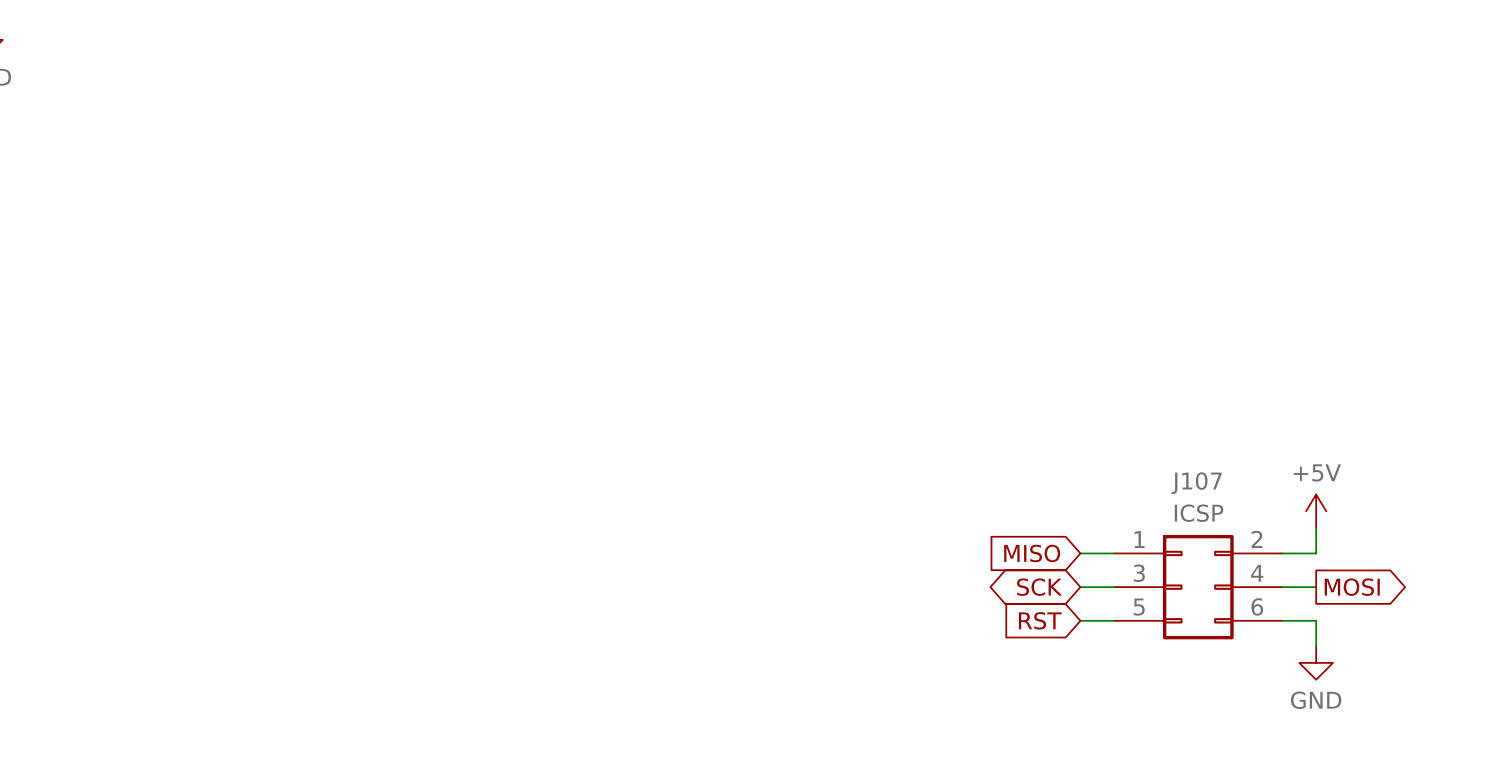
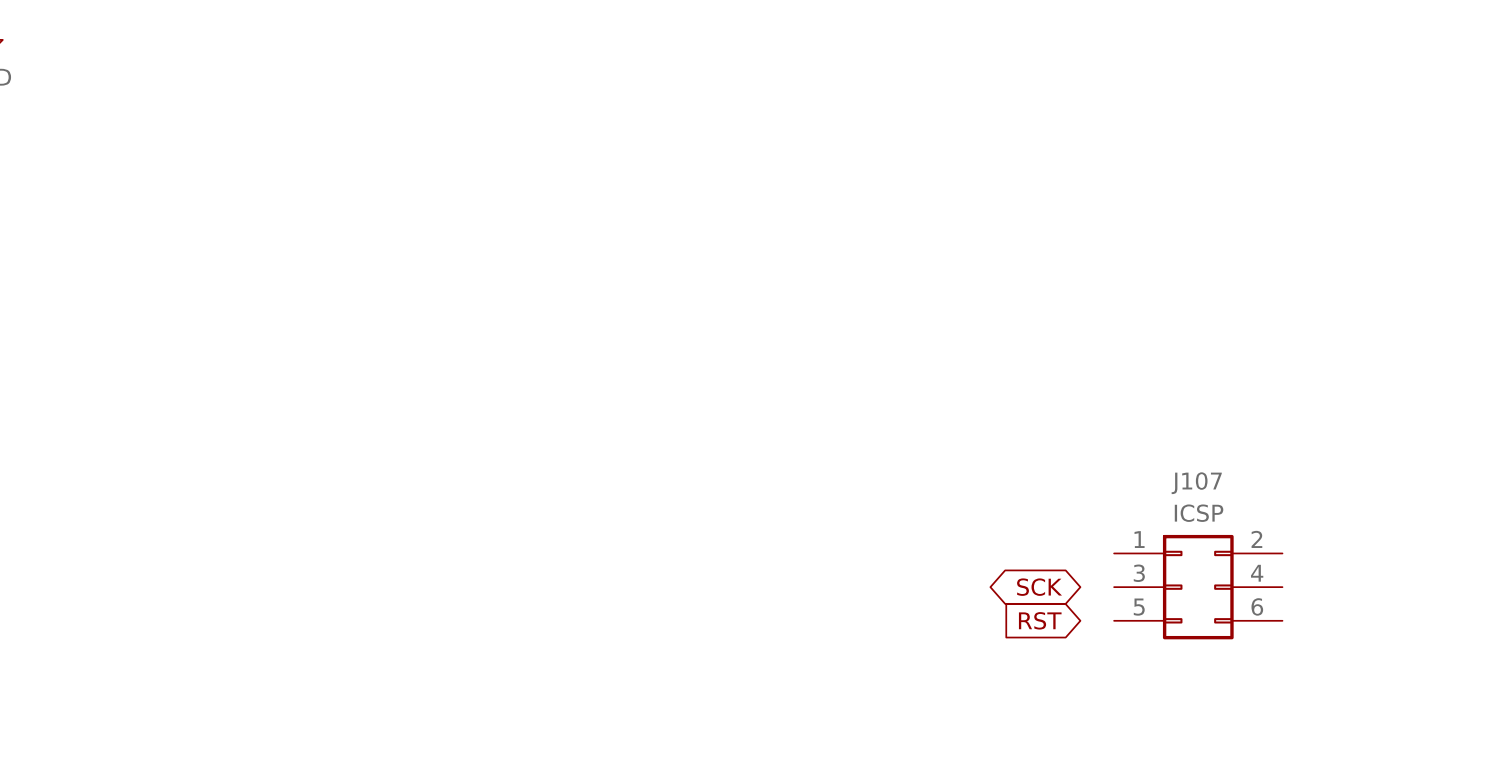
power symbol: +5V (1316, 511) -> none
wire: (1316, 528) (1316, 553) (1282, 553) -> none
global label: MISO (1032, 553) -> none
wire: (1080, 553) (1114, 553) -> none
wire: (1080, 587) (1114, 587) -> none
wire: (1282, 587) (1316, 587) -> none
global label: MOSI (1352, 587) -> none
wire: (1080, 620) (1114, 620) -> none
wire: (1282, 620) (1316, 620) (1316, 646) -> none
power symbol: GND (1316, 662) -> none

